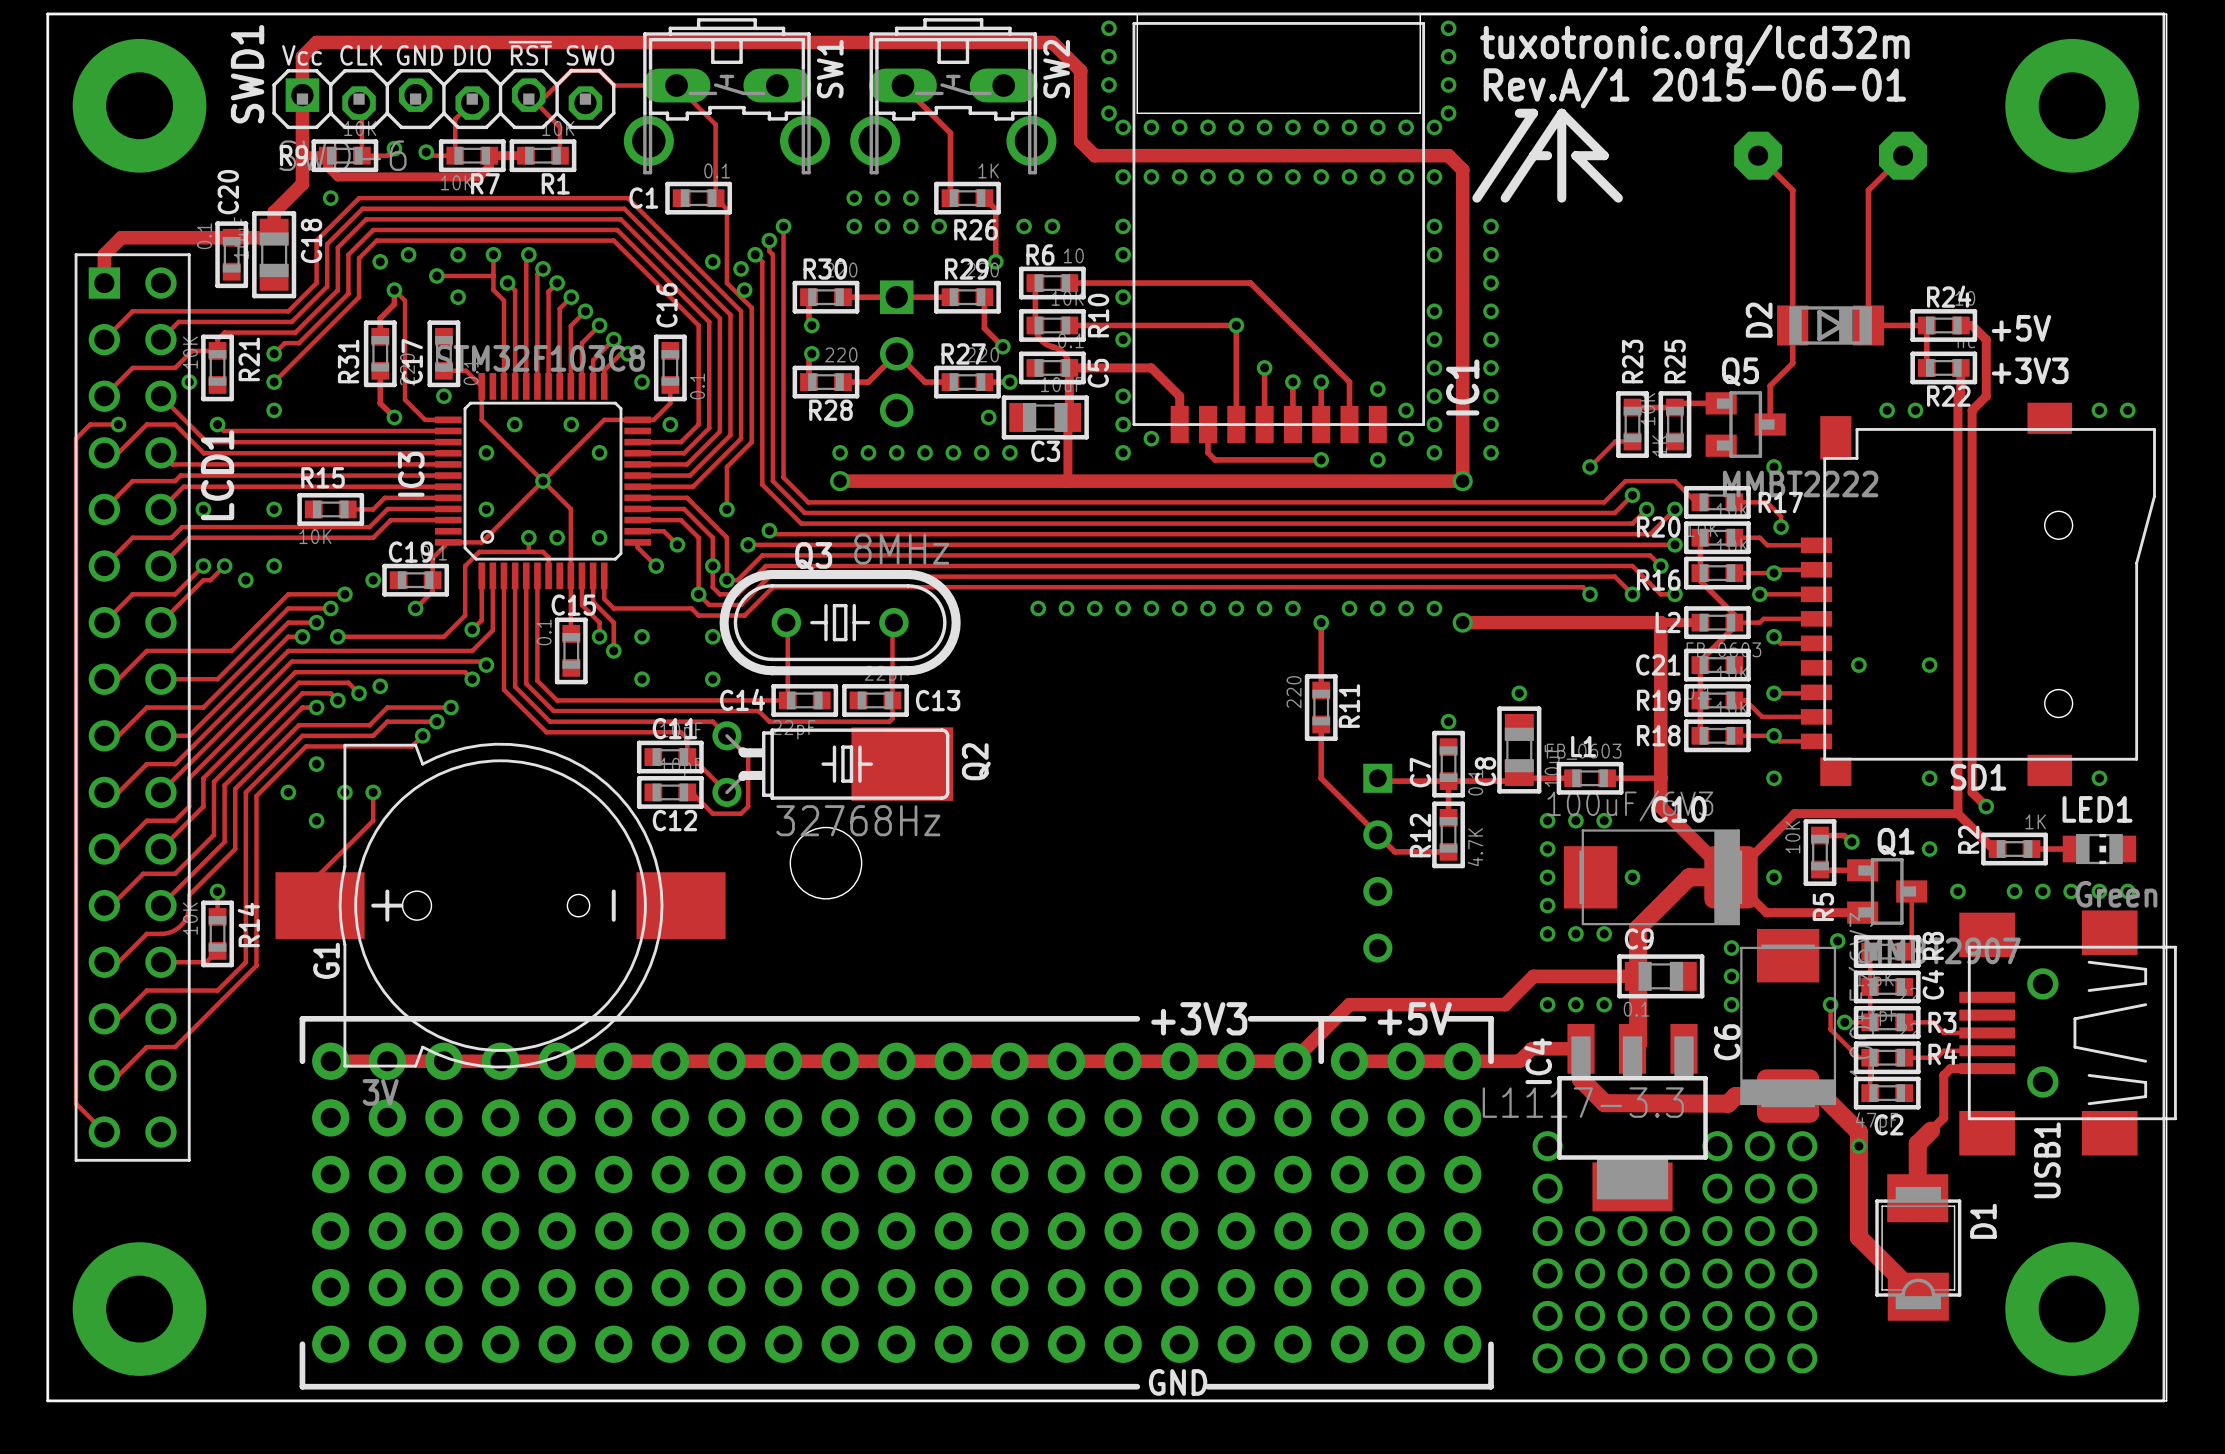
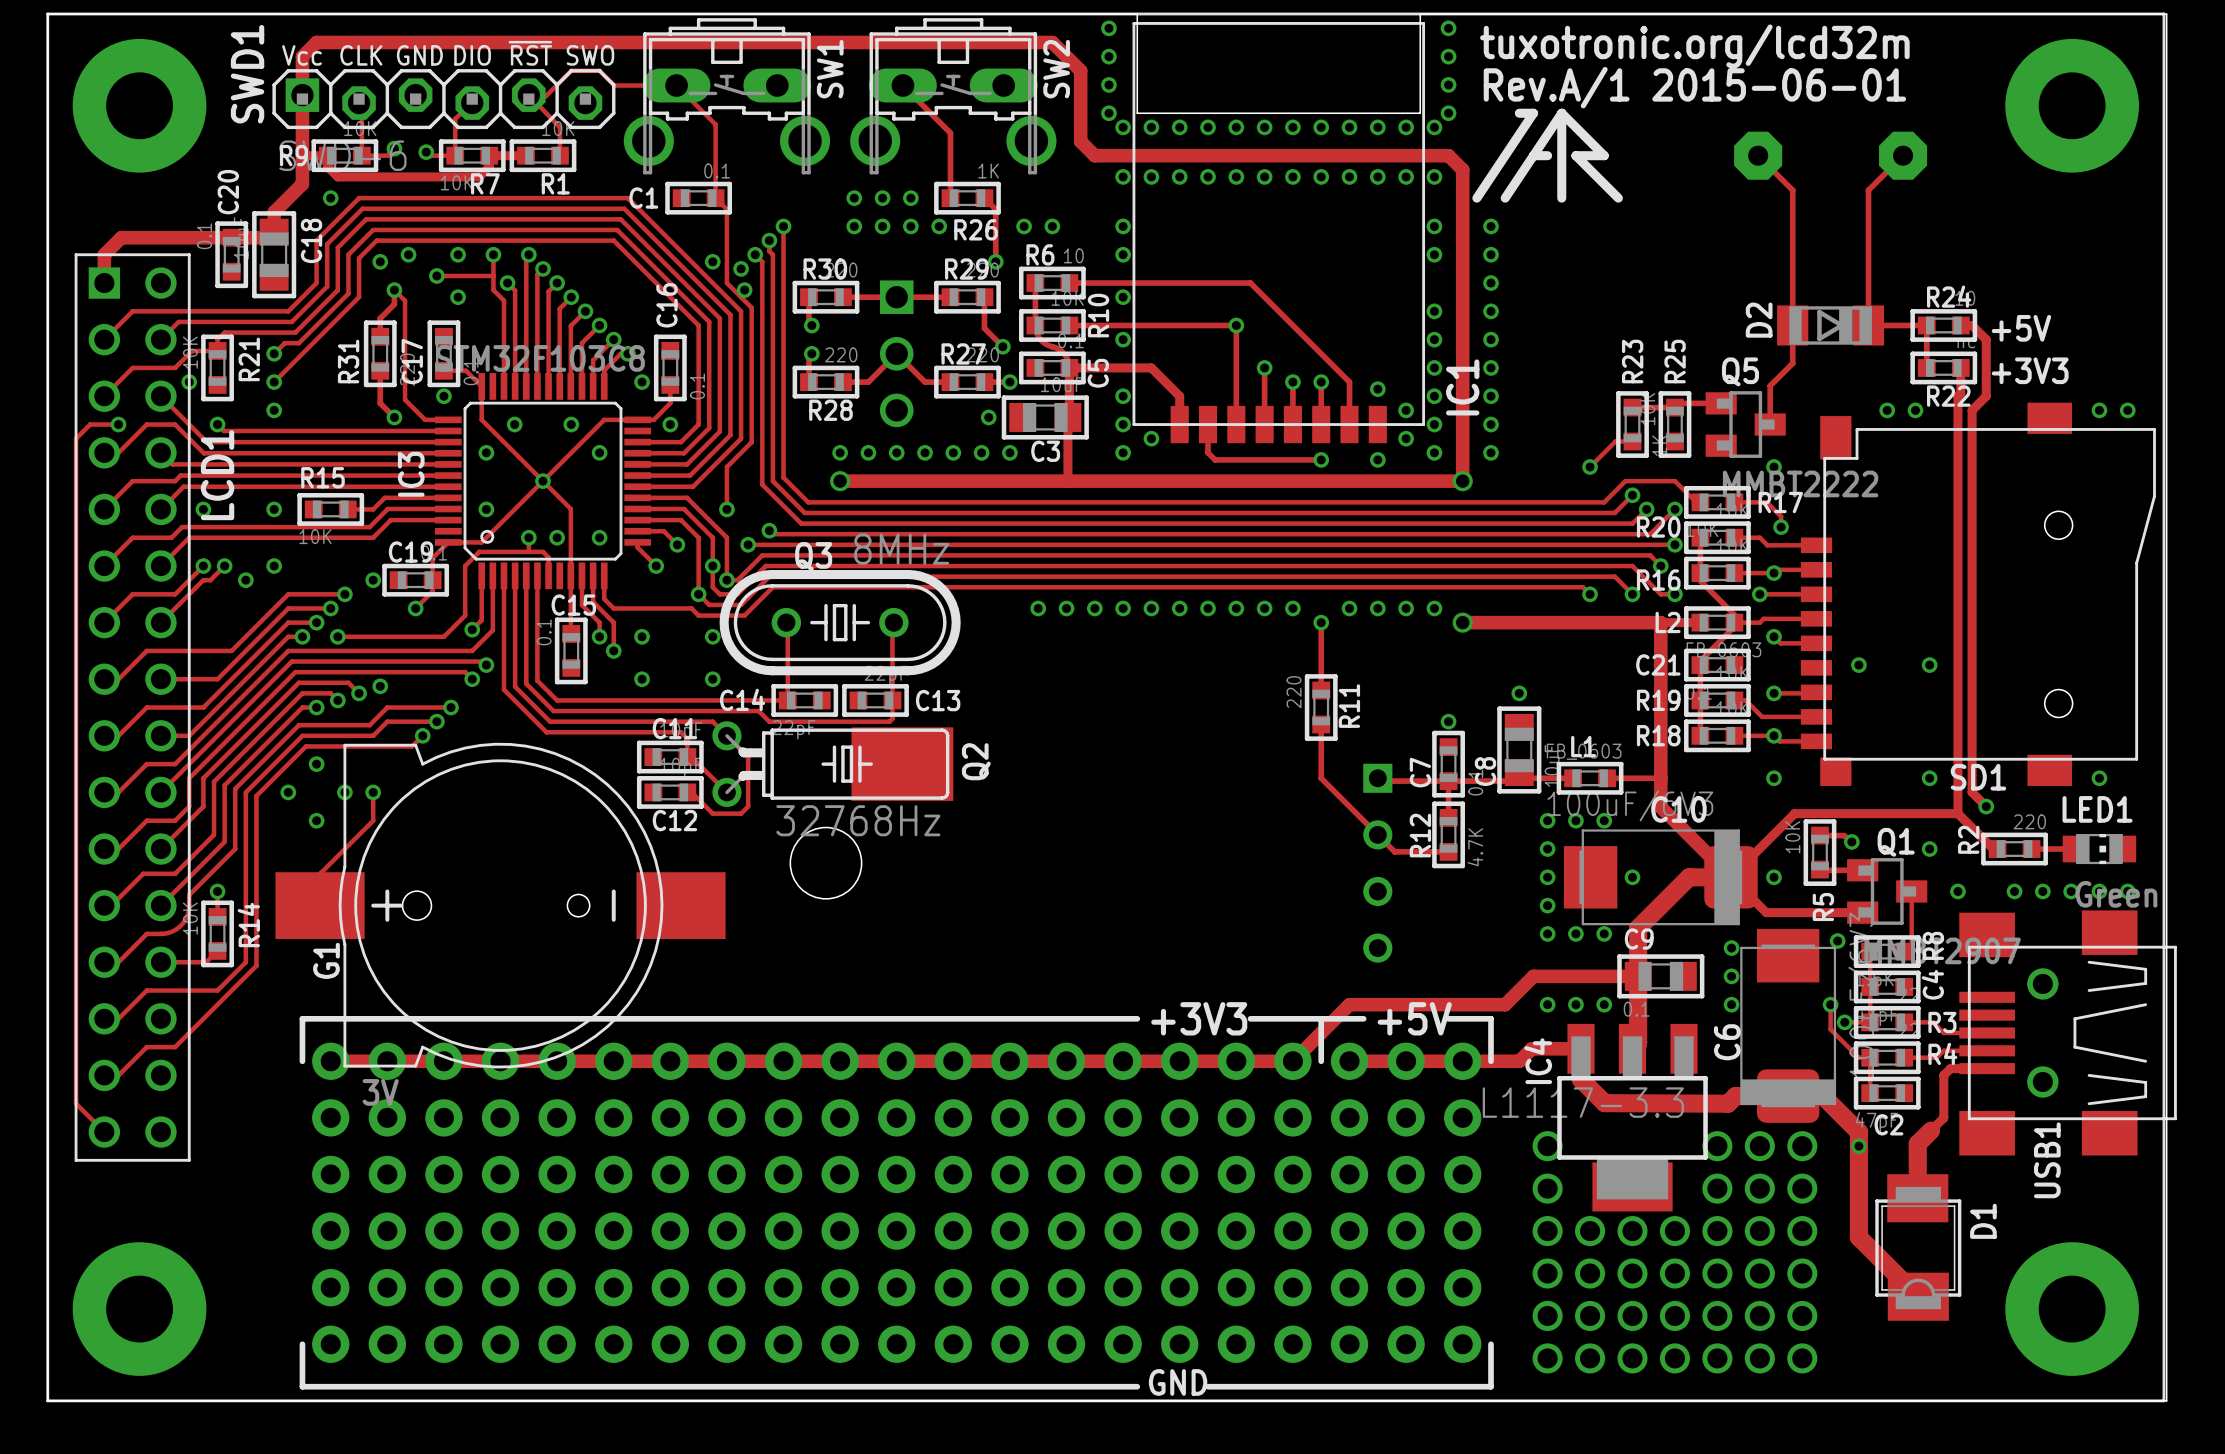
R2 value: 1K (2035, 821) -> 220 (2029, 821)

